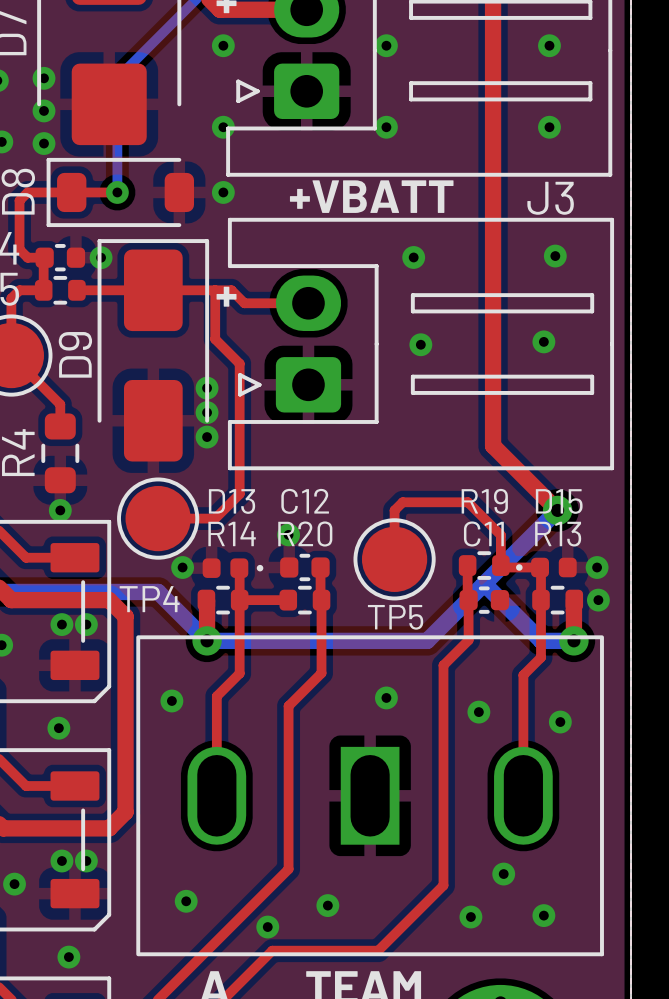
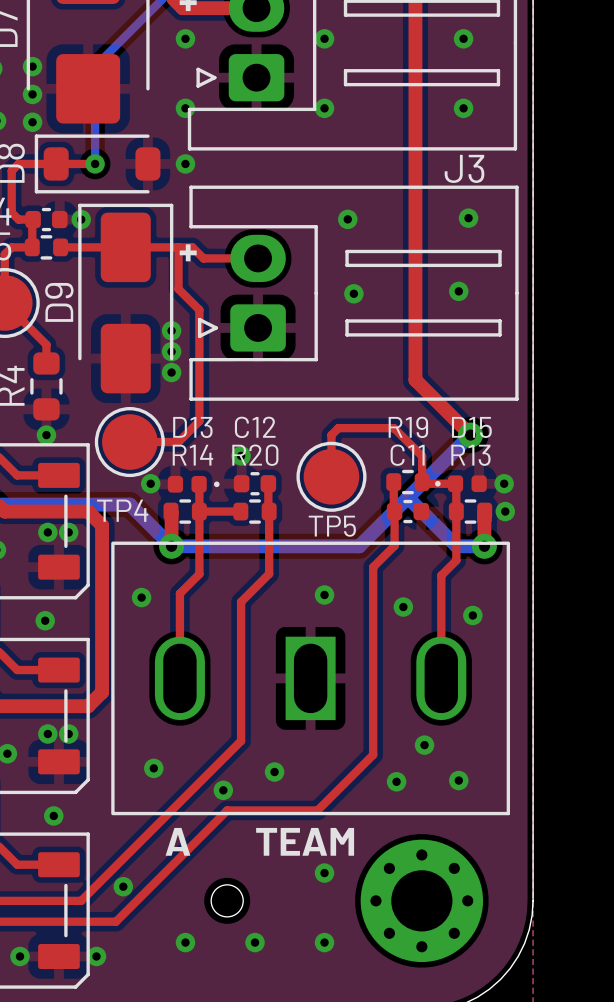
text: +VBATT (371, 196) -> none

